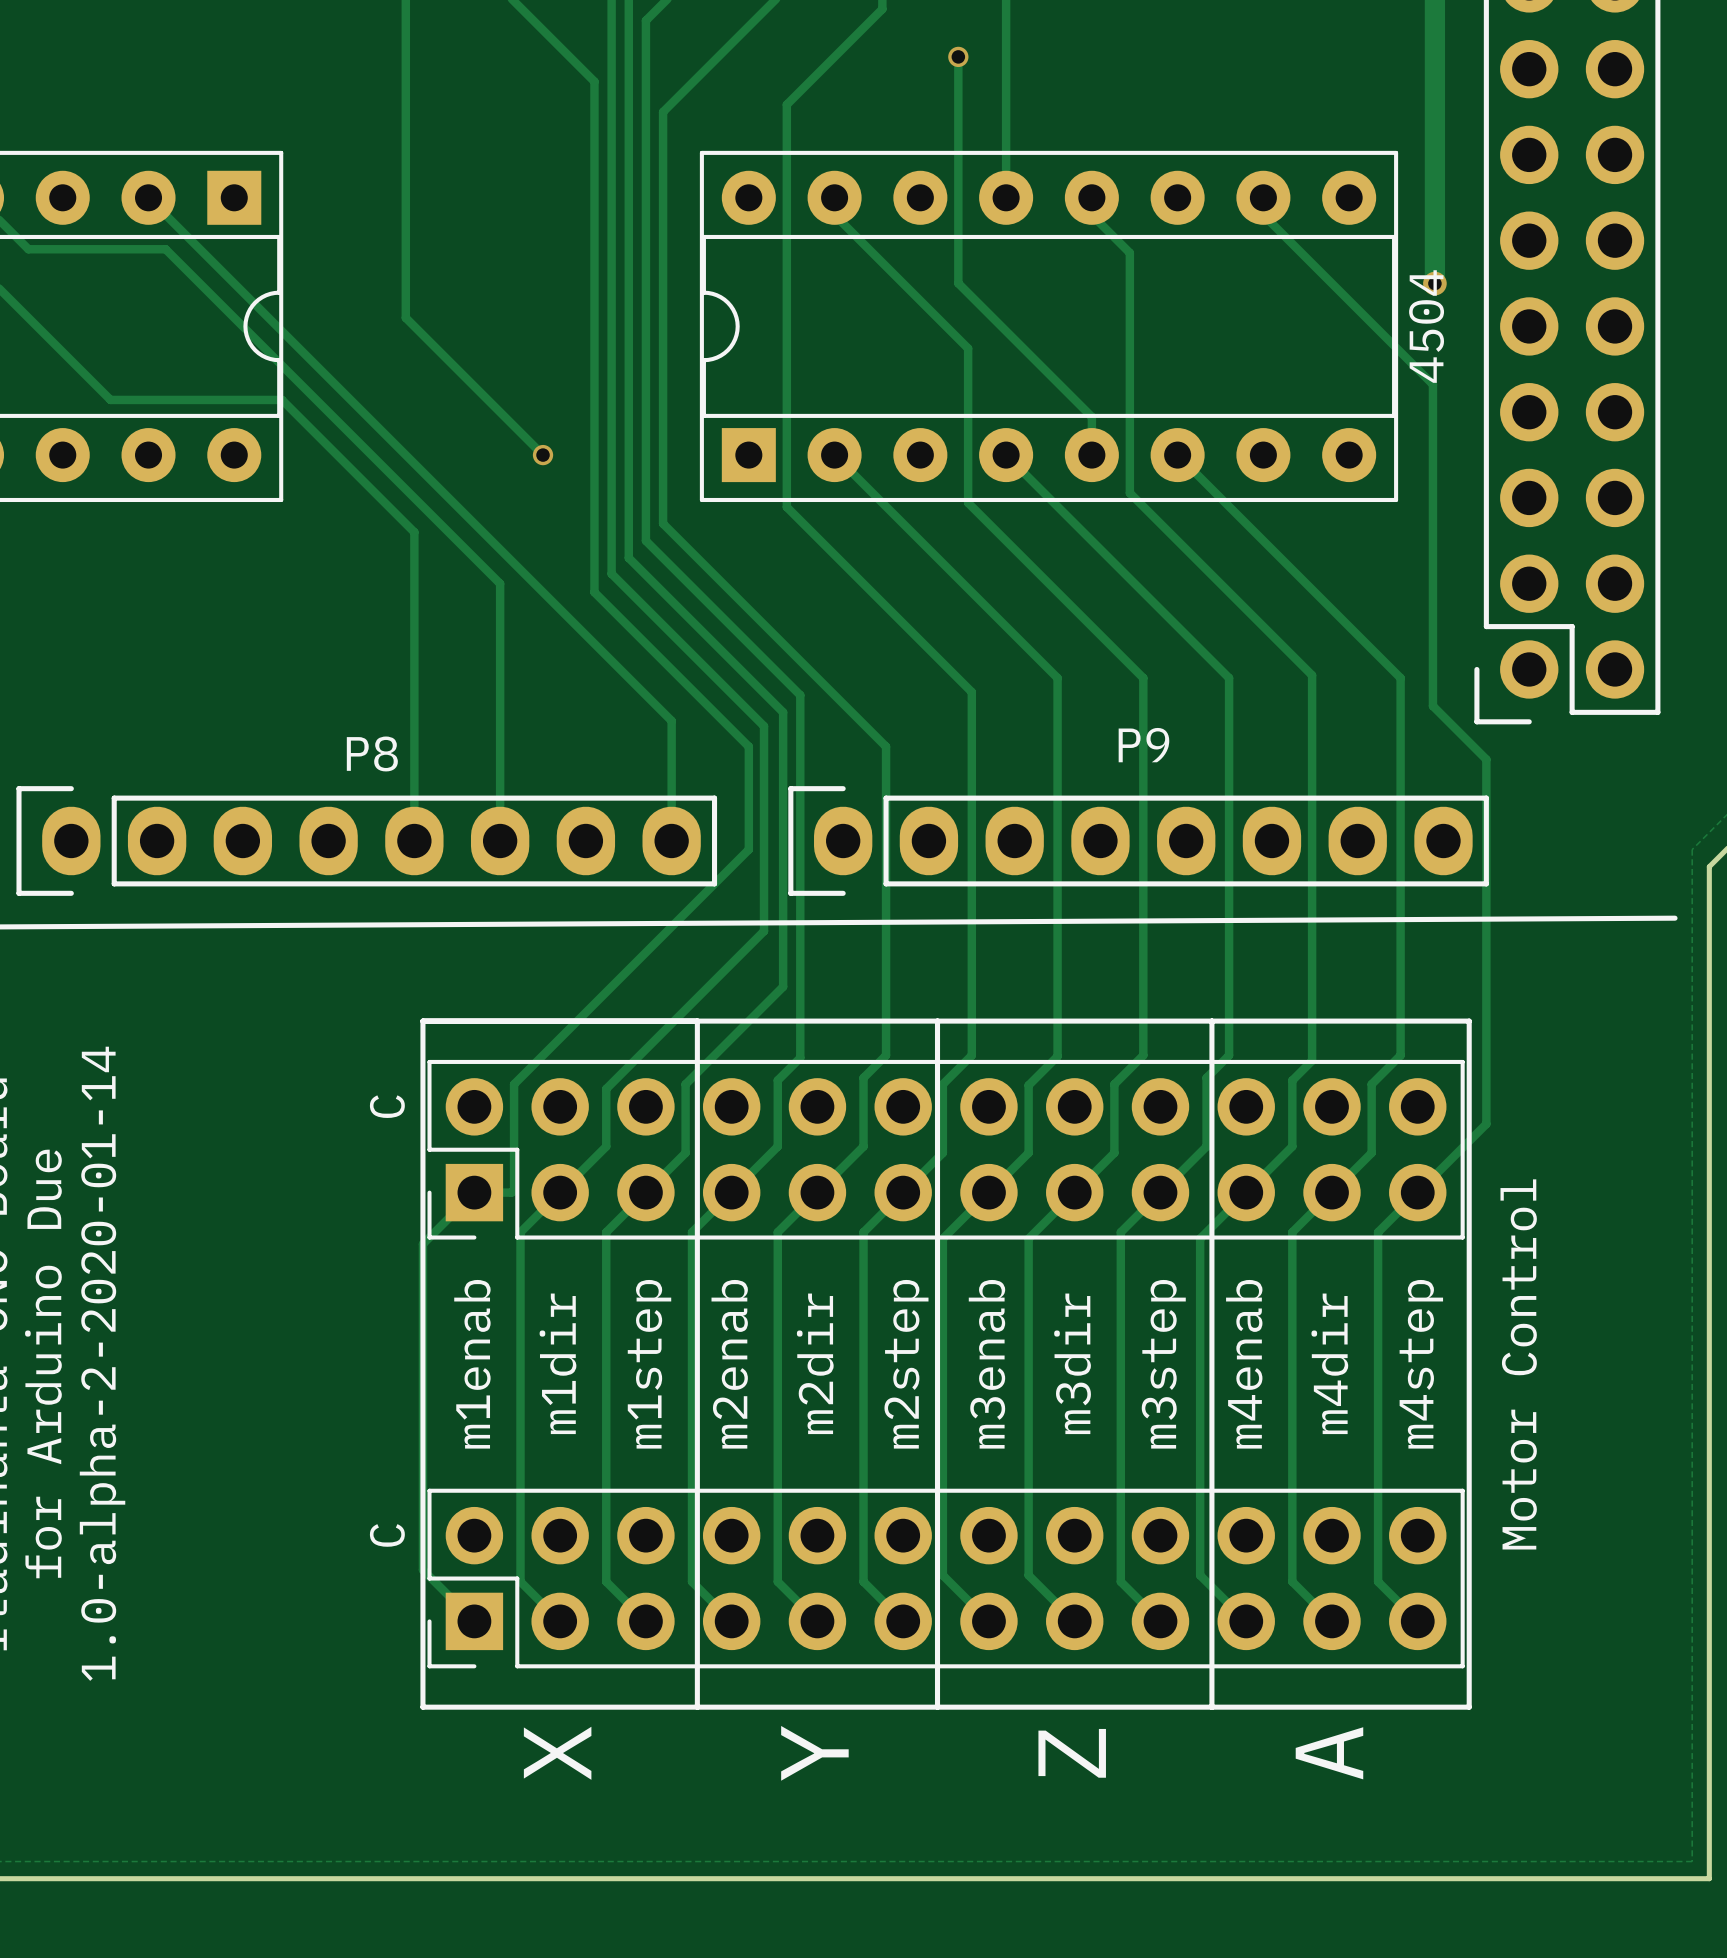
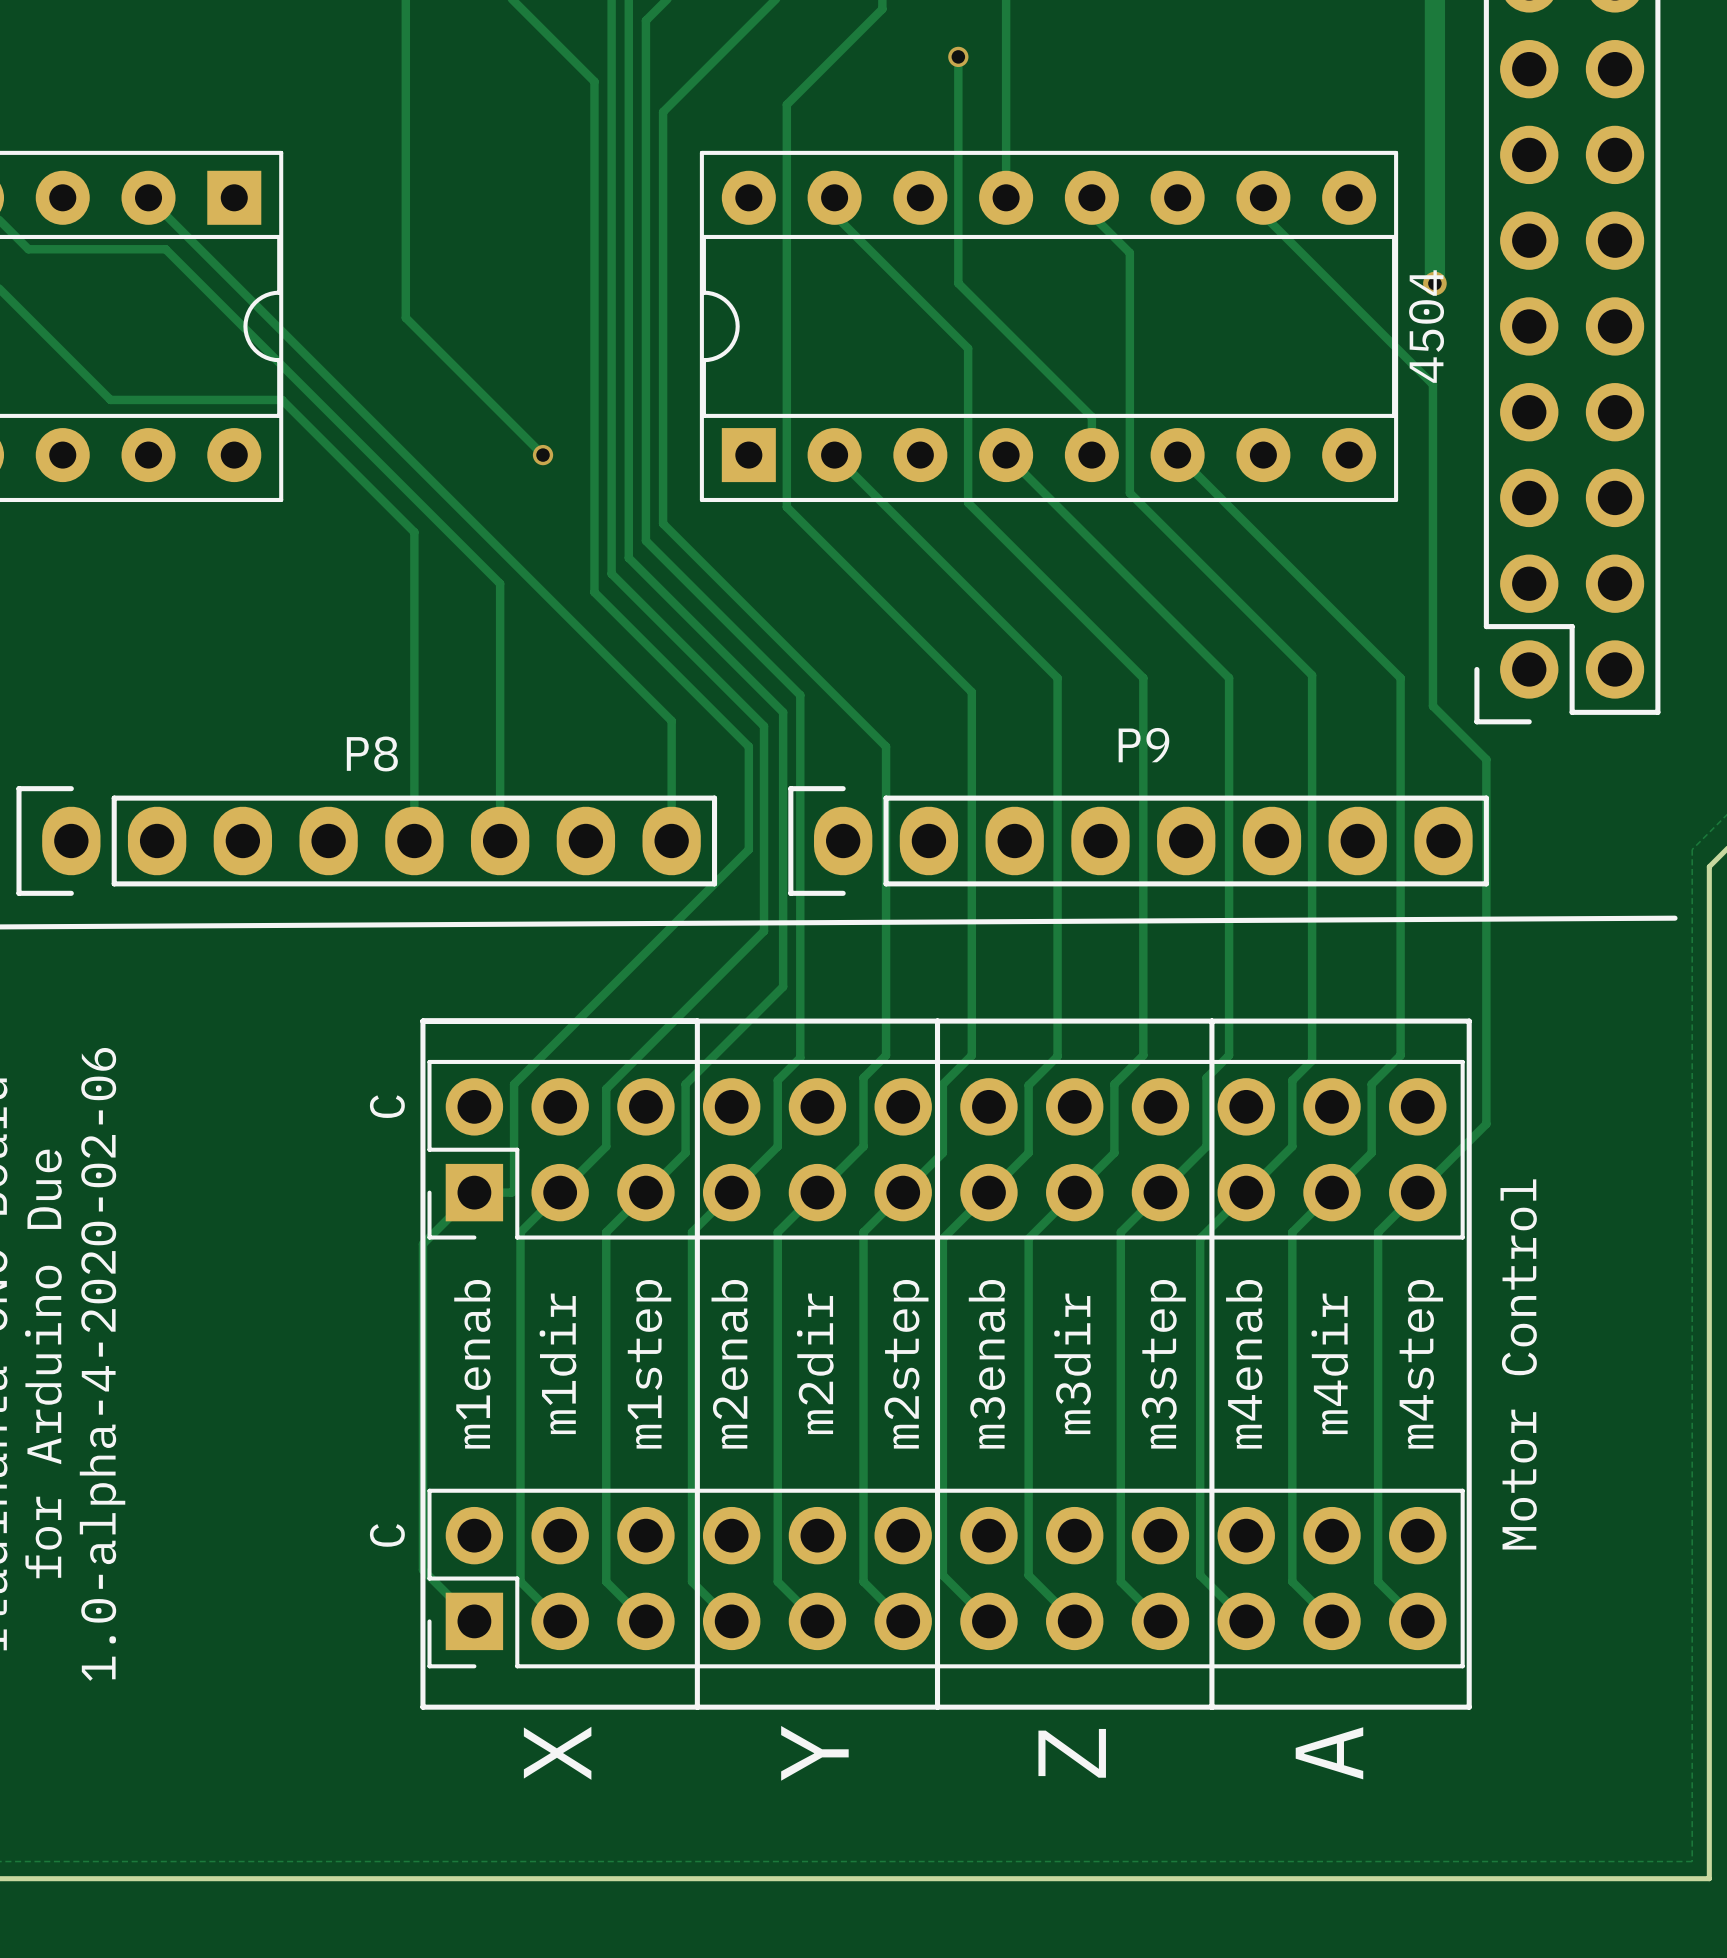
text: 1.0-alpha-2-2020-01-14 (102, 1363) -> 1.0-alpha-4-2020-02-06 (102, 1364)

